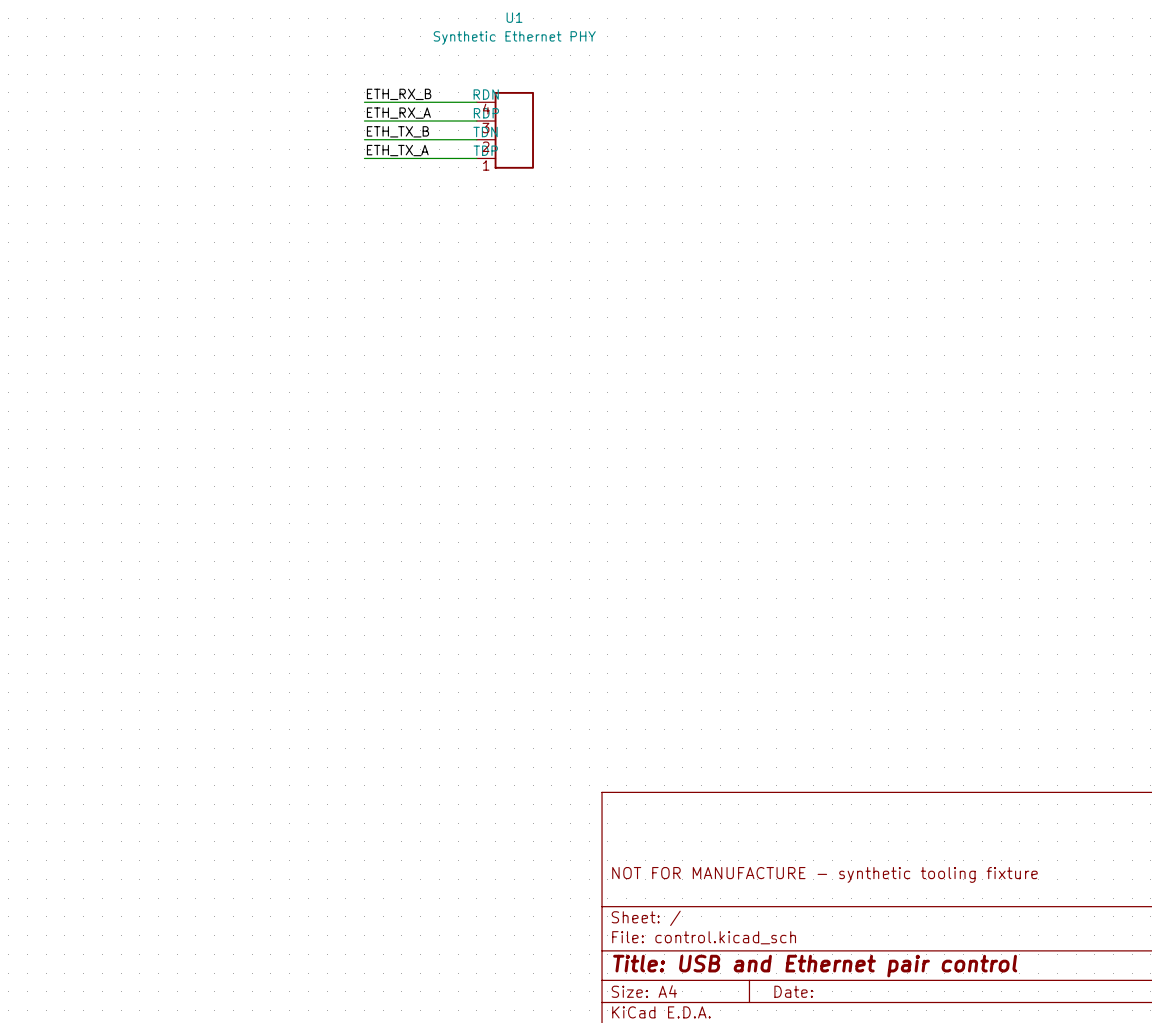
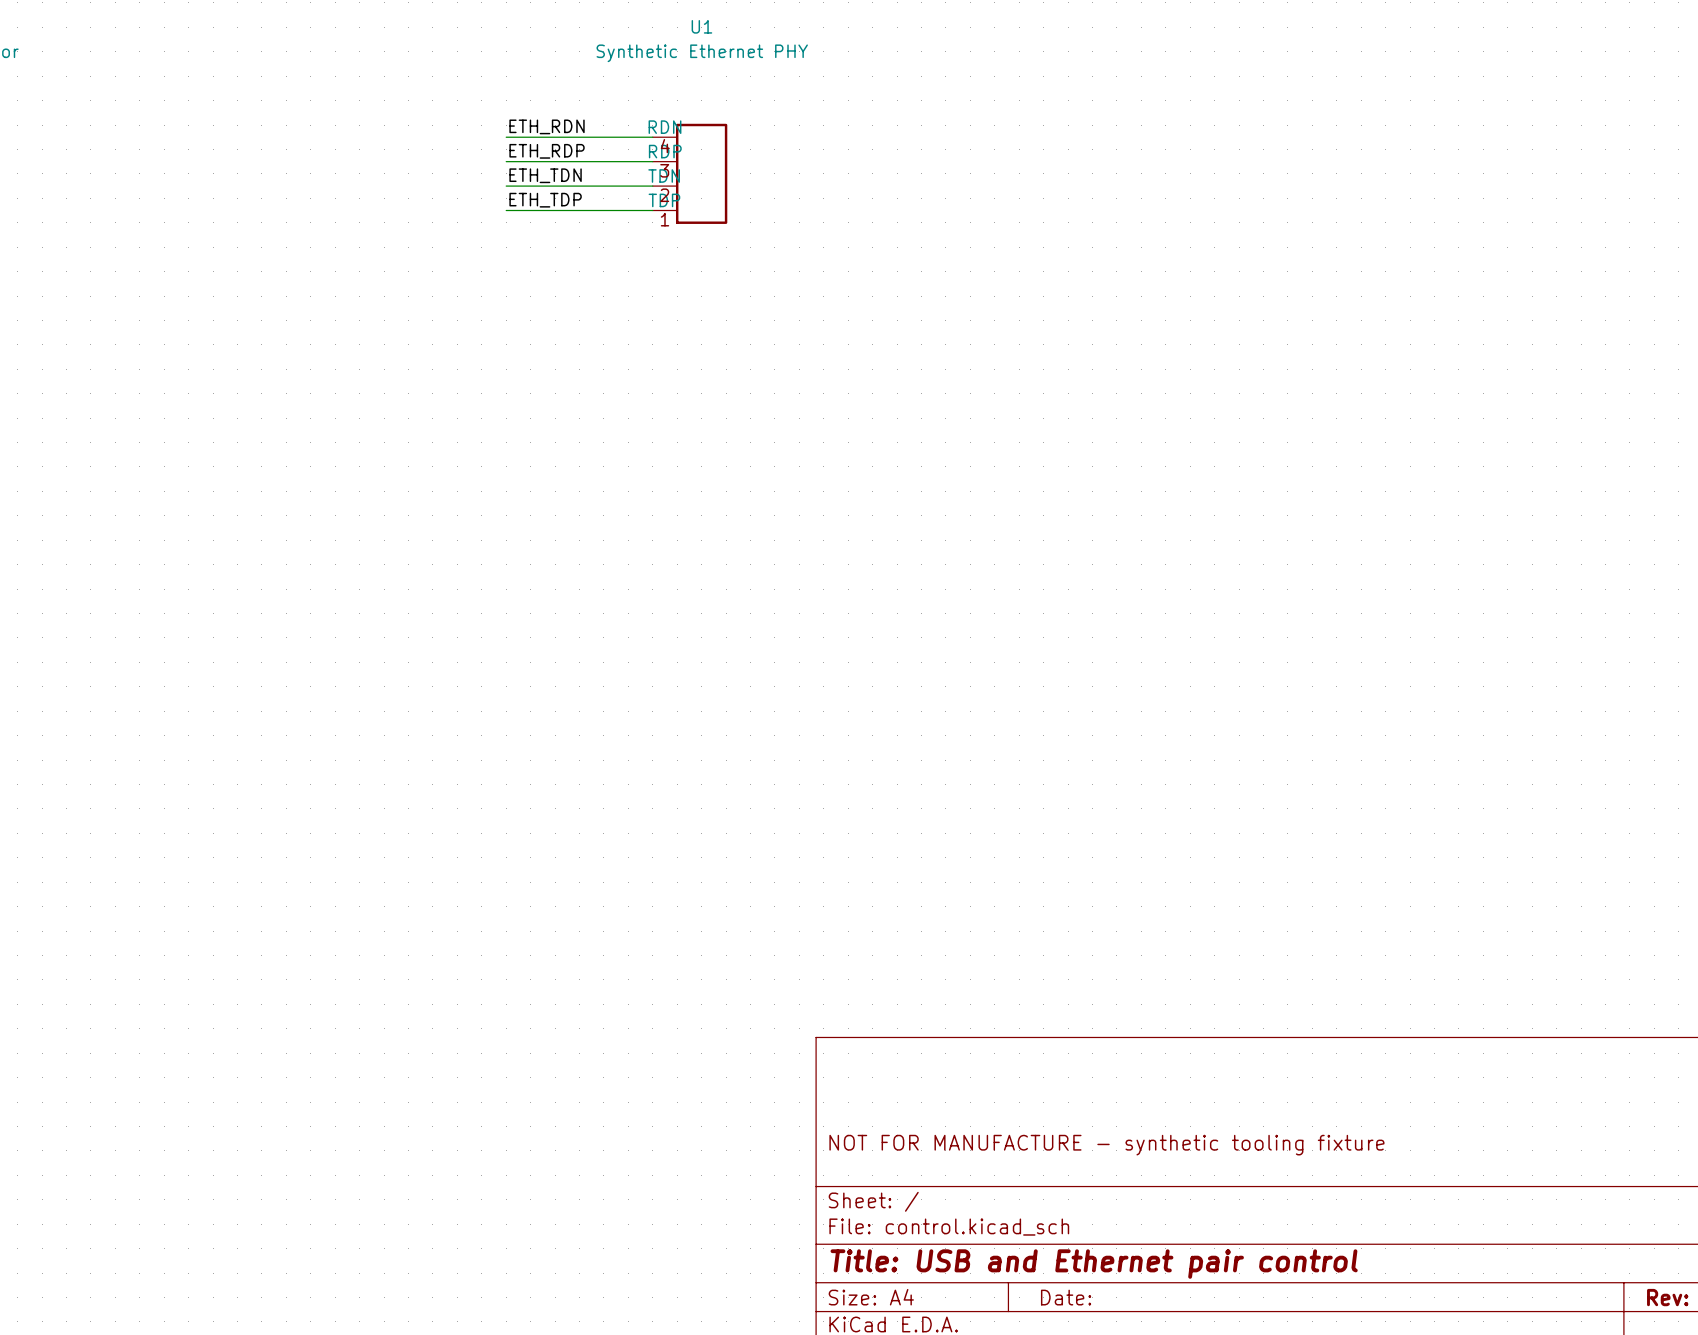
label: ETH_RX_B (399, 94) -> ETH_RDN (547, 126)
label: ETH_RX_A (398, 113) -> ETH_RDP (547, 151)
label: ETH_TX_B (397, 131) -> ETH_TDN (545, 175)
label: ETH_TX_A (397, 150) -> ETH_TDP (545, 200)

